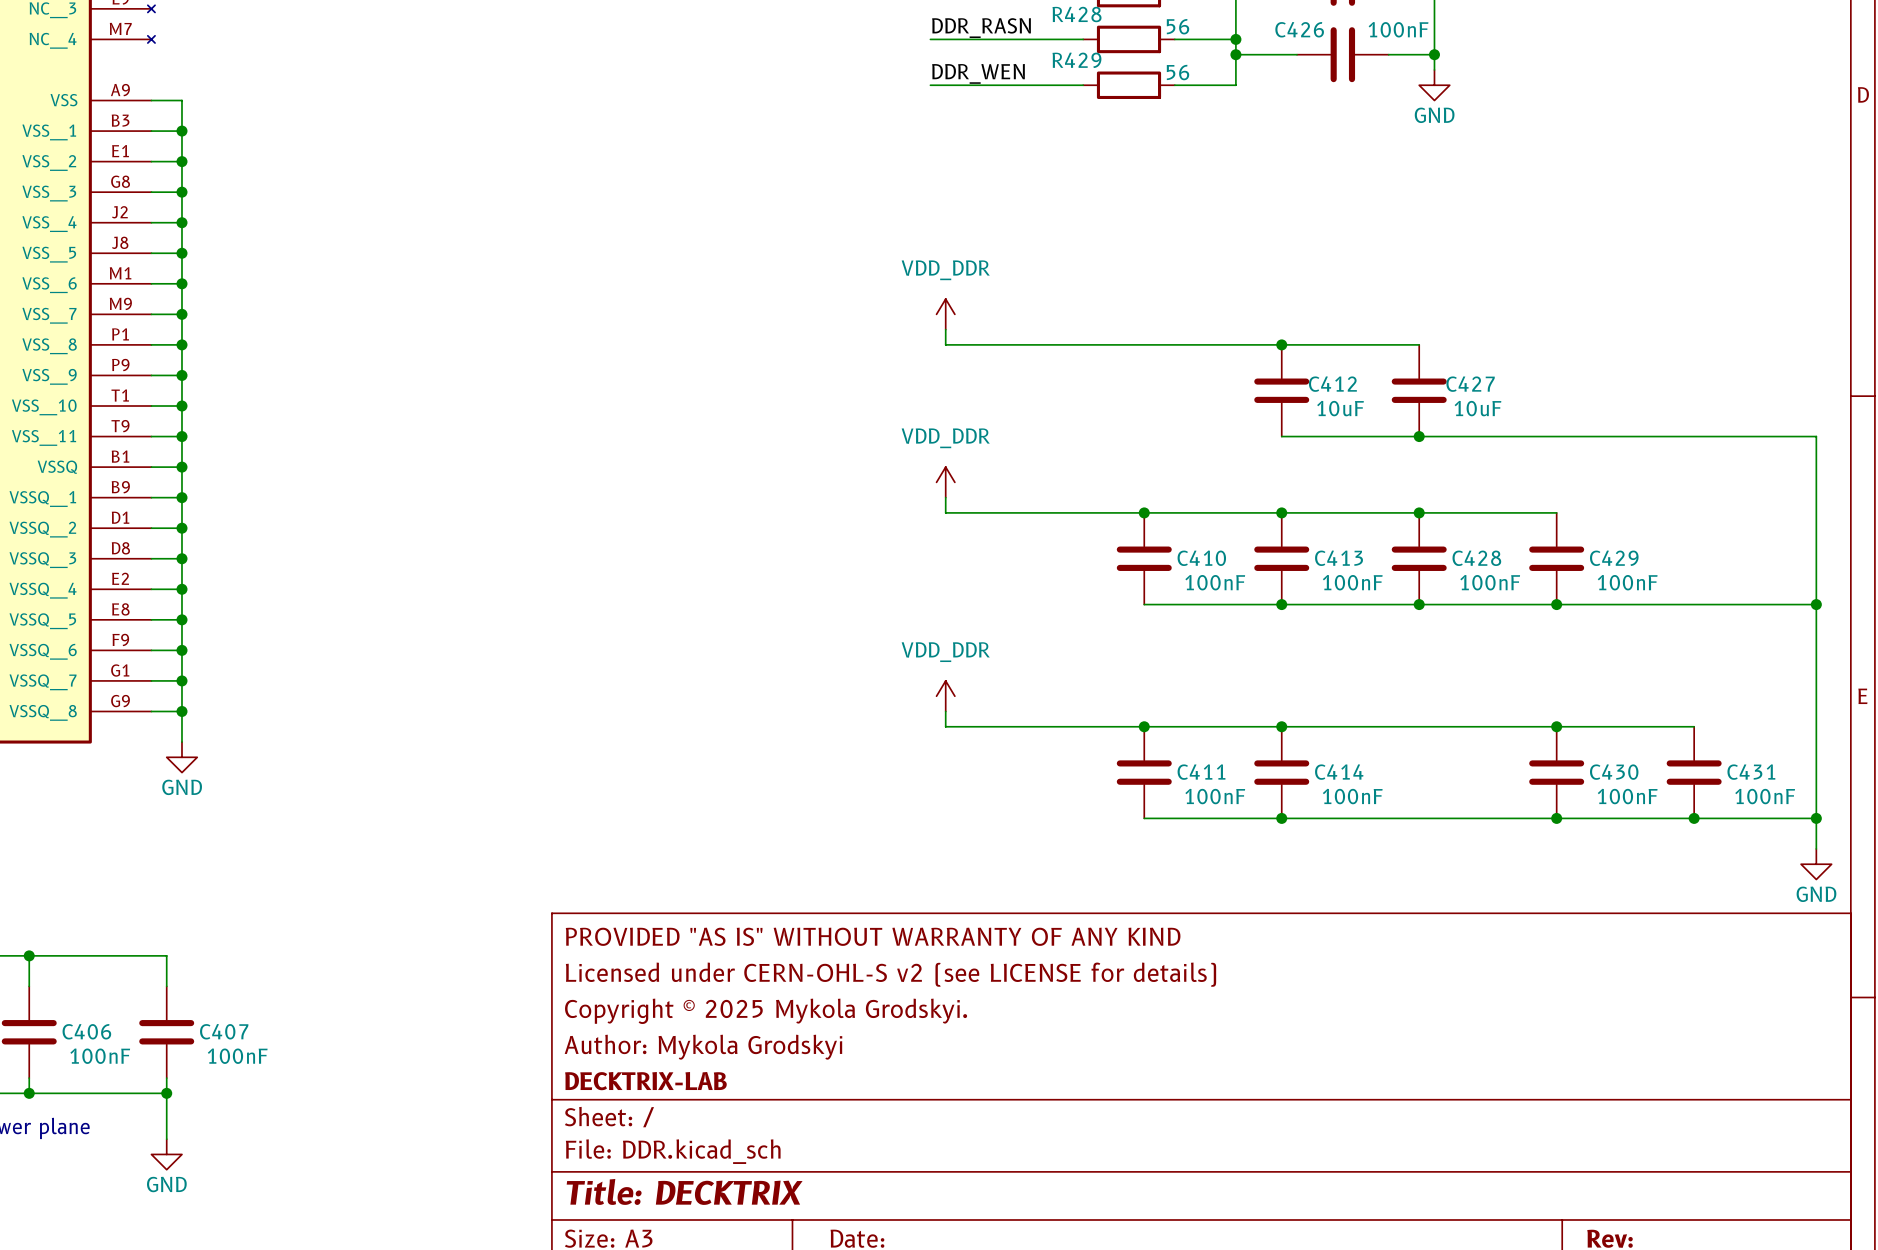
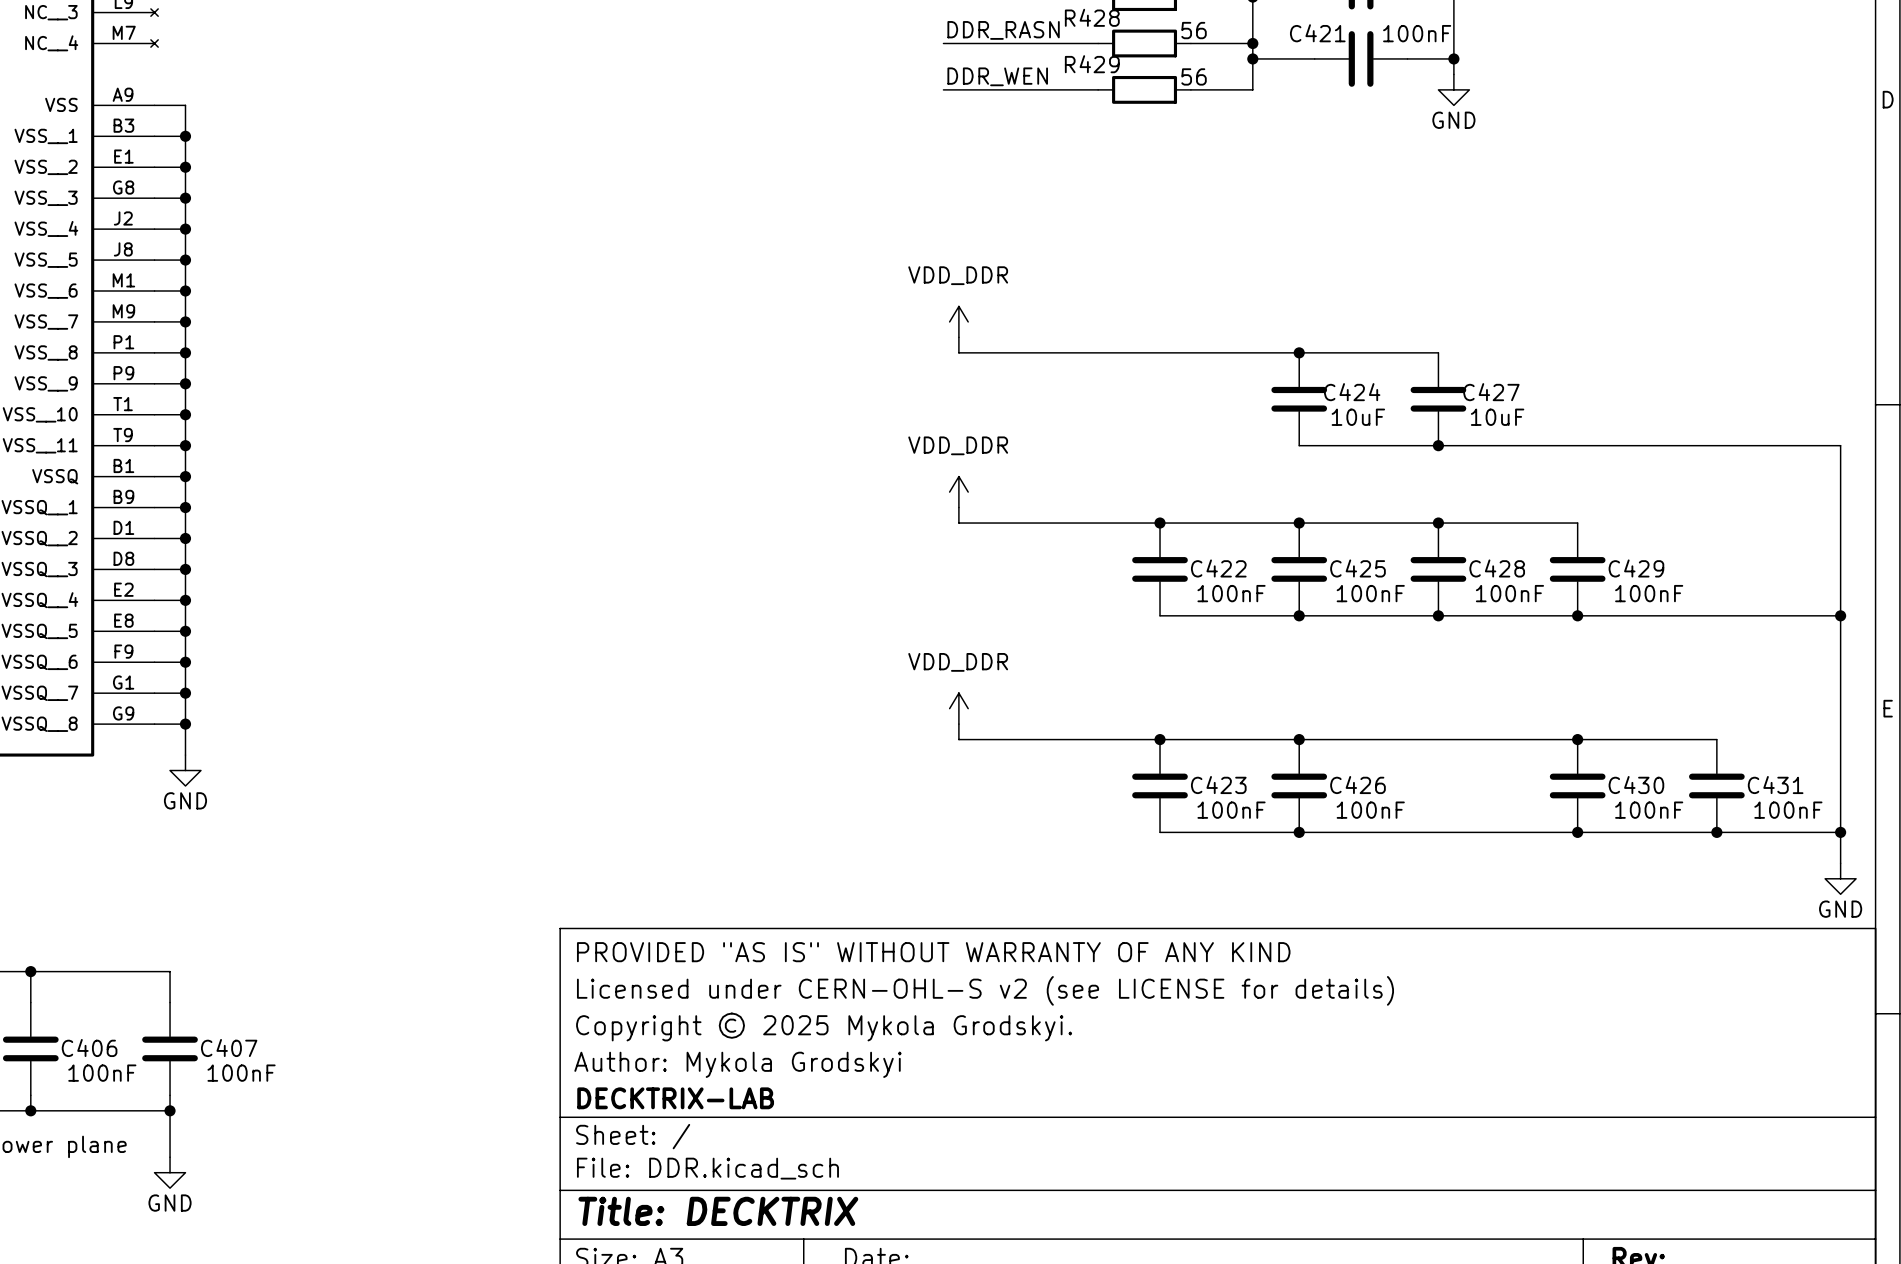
C426 name: C426 (1299, 29) -> C421 (1317, 33)
C412 name: C412 (1332, 384) -> C424 (1352, 392)
C410 name: C410 (1201, 558) -> C422 (1218, 568)
C413 name: C413 (1339, 558) -> C425 (1358, 568)
C411 name: C411 (1201, 772) -> C423 (1218, 785)
C414 name: C414 (1339, 772) -> C426 (1358, 785)

